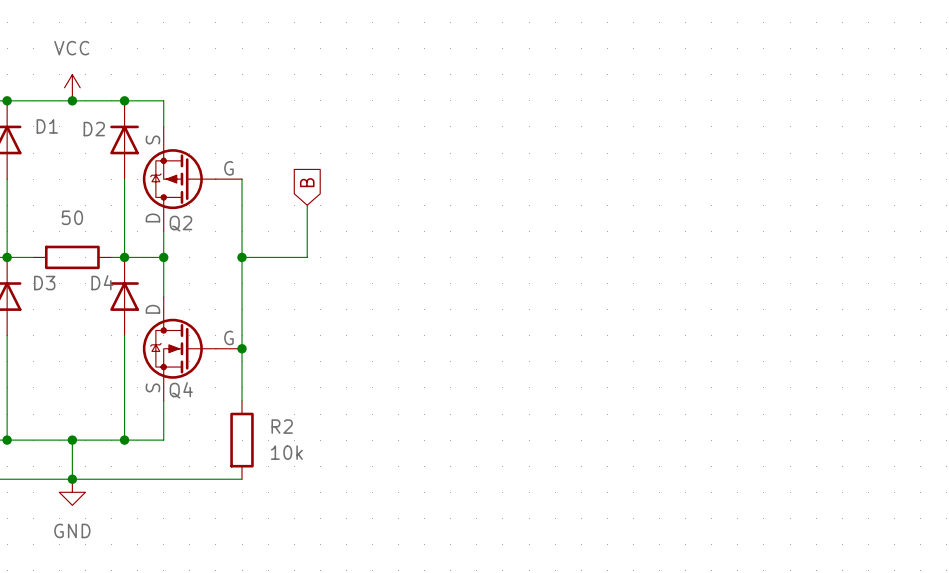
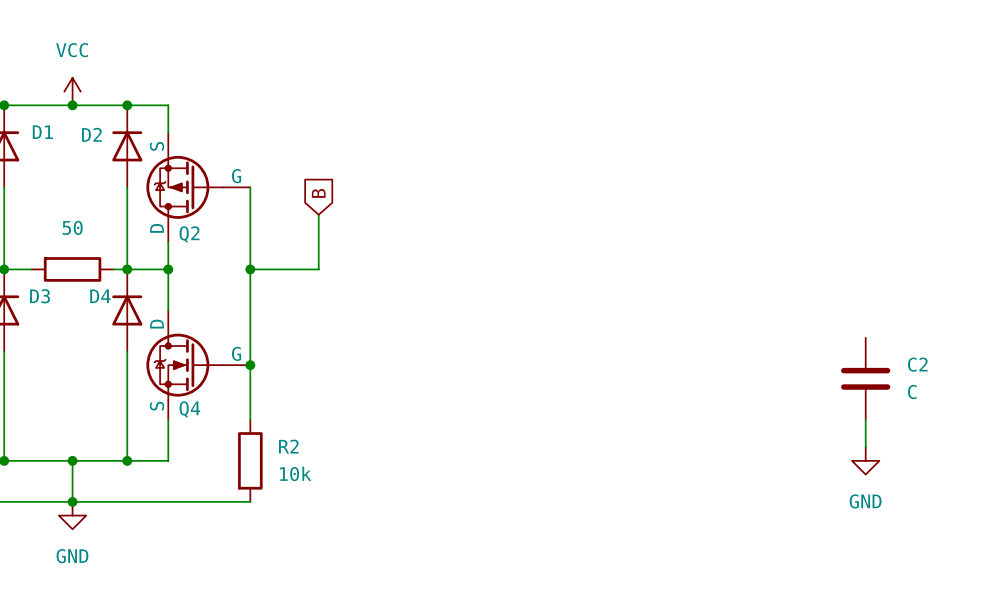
C2: none -> C (865, 378)
wire: none -> (865, 419) (865, 447)
power symbol: none -> GND (865, 460)

